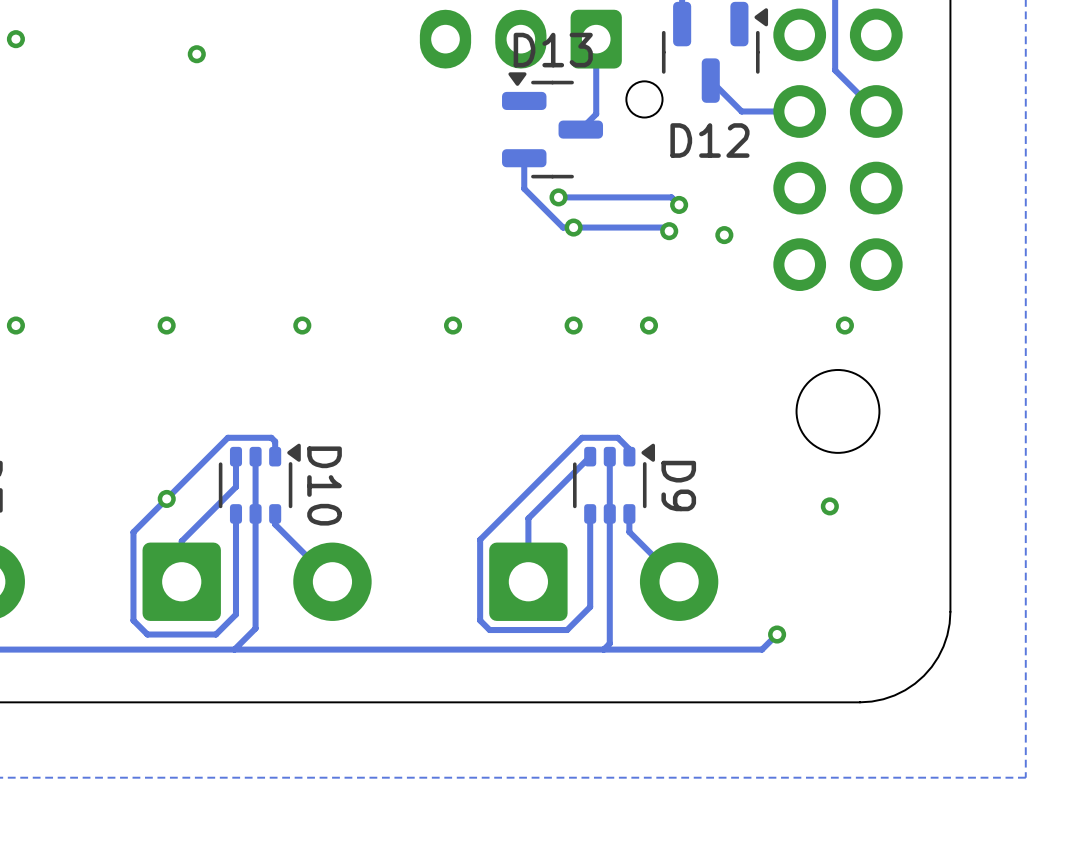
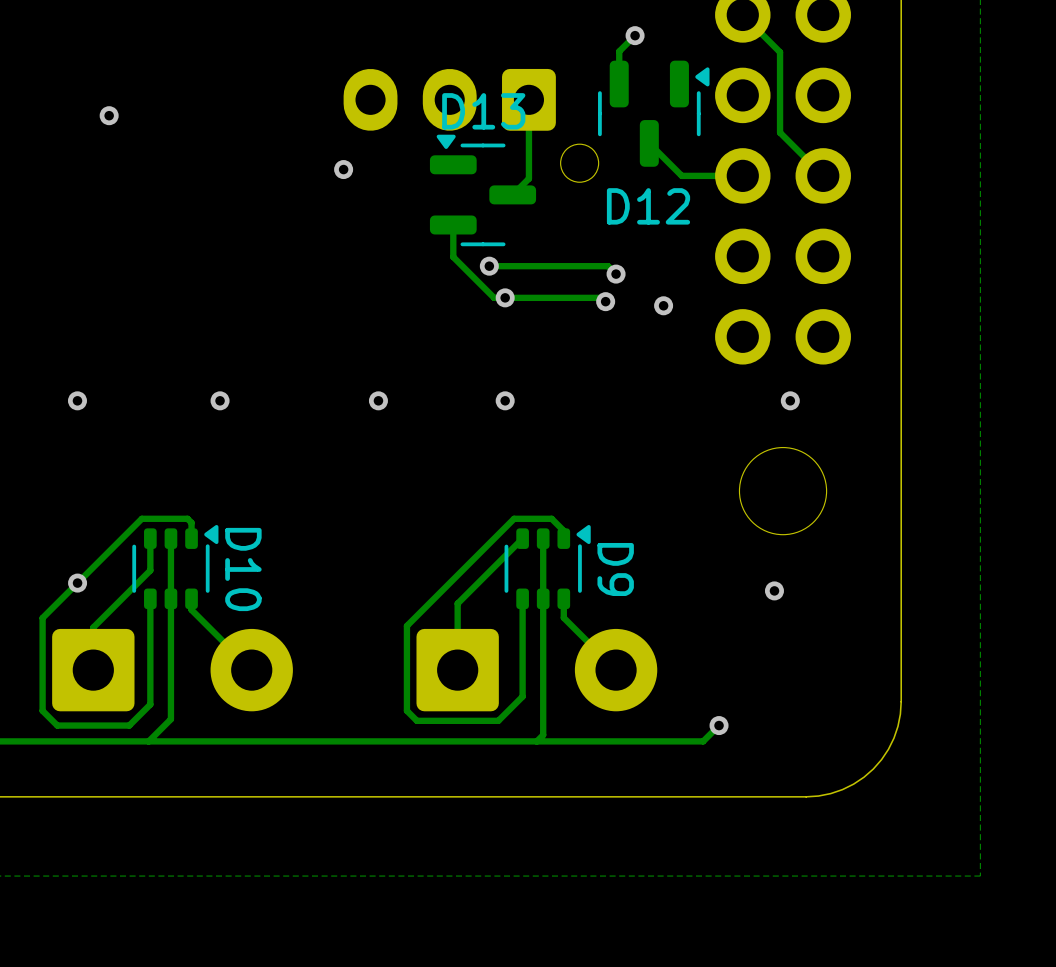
via: none -> (343, 169)
via: (648, 325) -> none

